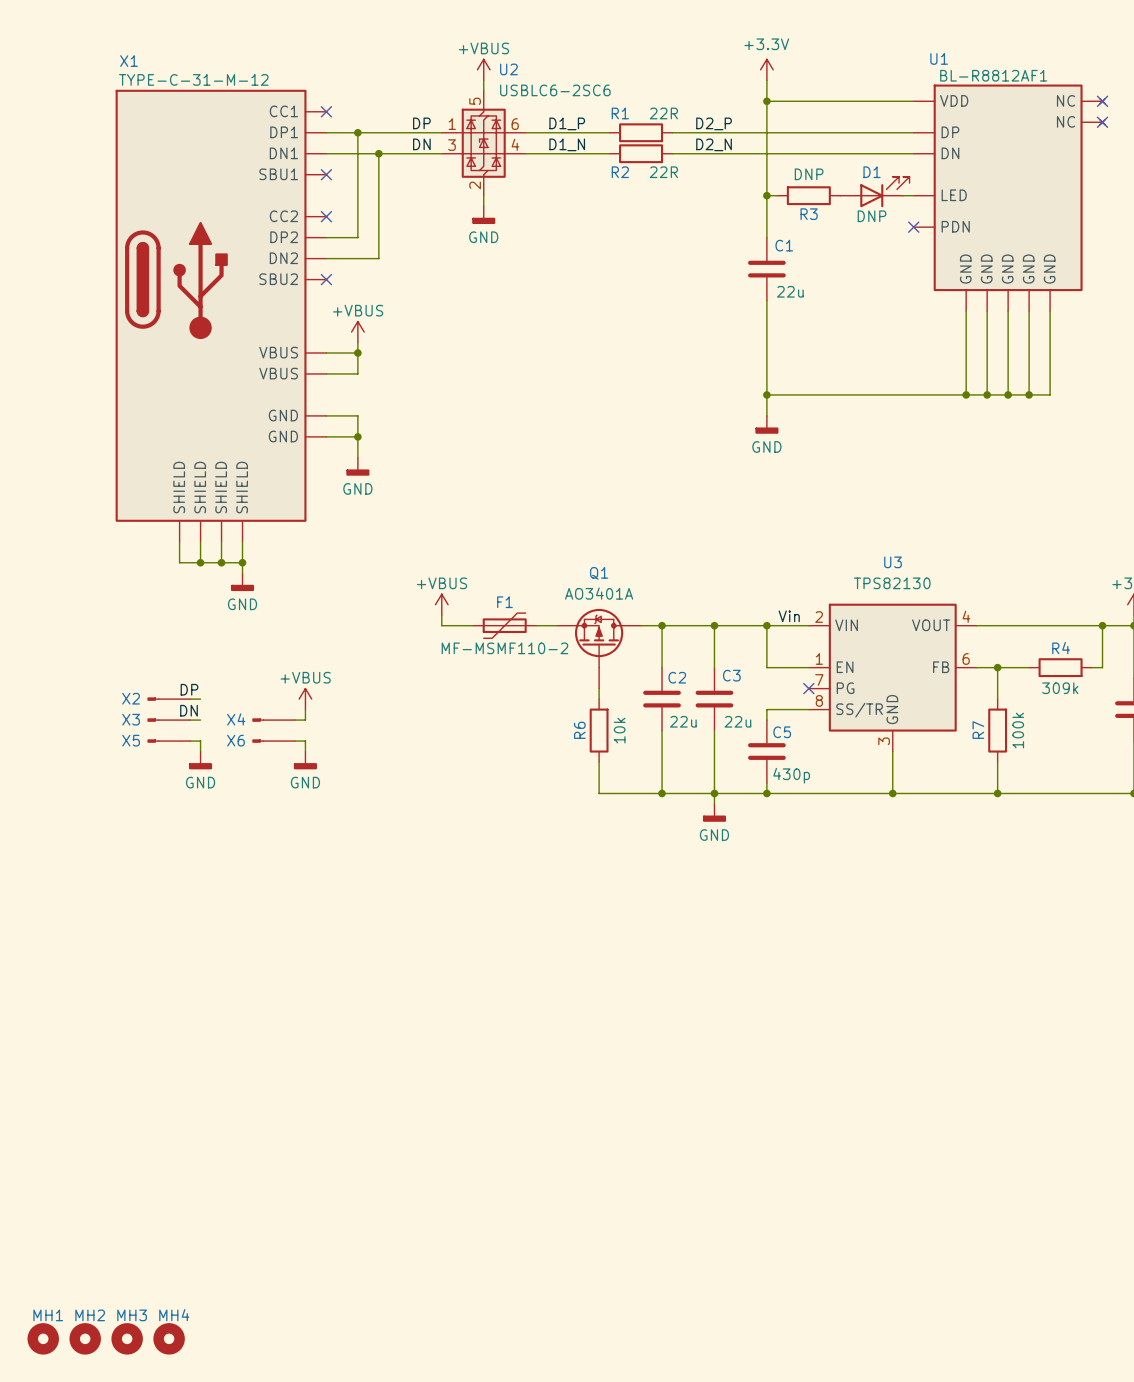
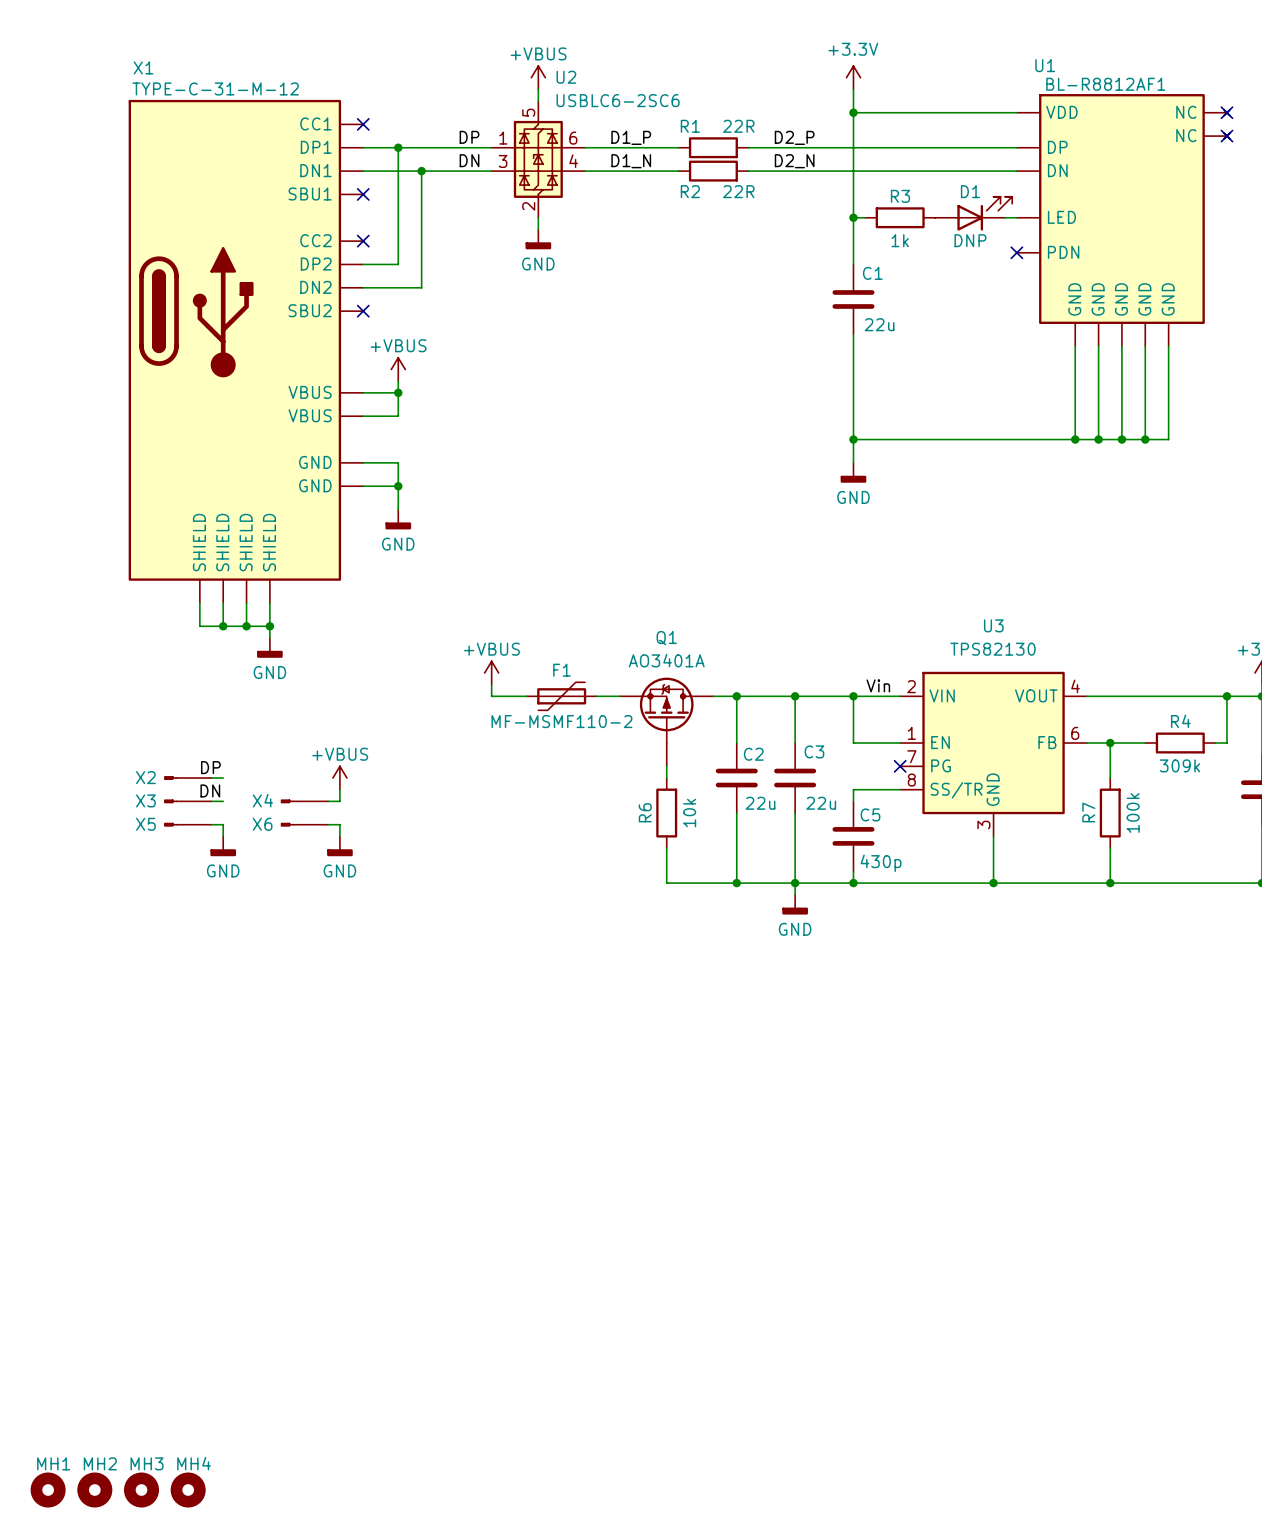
R3 value: DNP (809, 174) -> 1k (900, 240)
R3 name position: R3 (809, 214) -> R3 (900, 196)

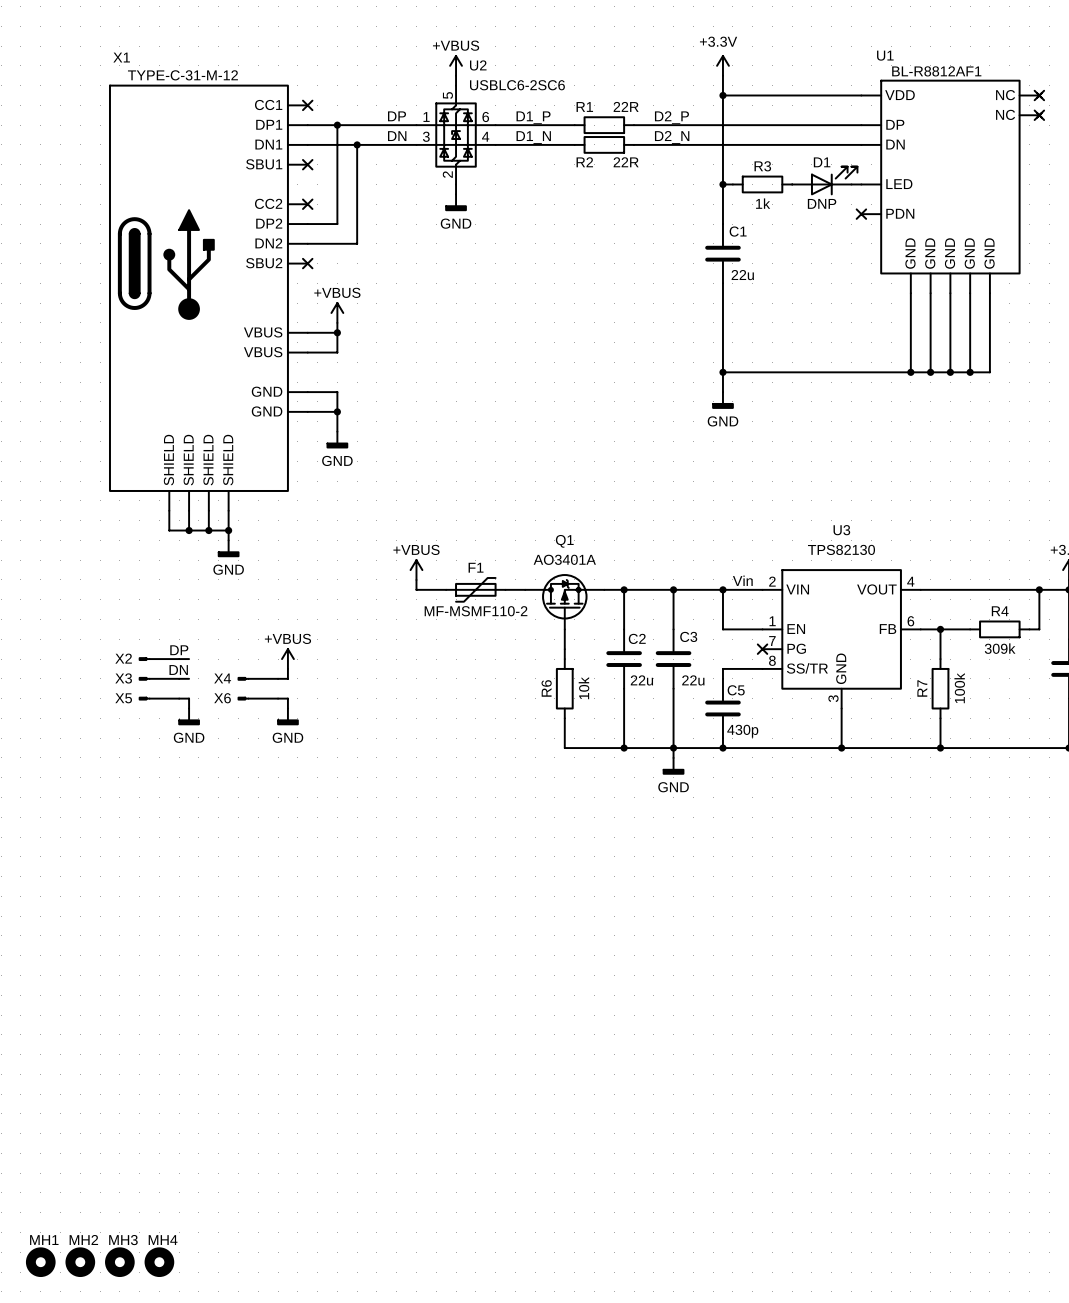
Q1 flip: as is (666, 710) -> left-right (564, 601)

